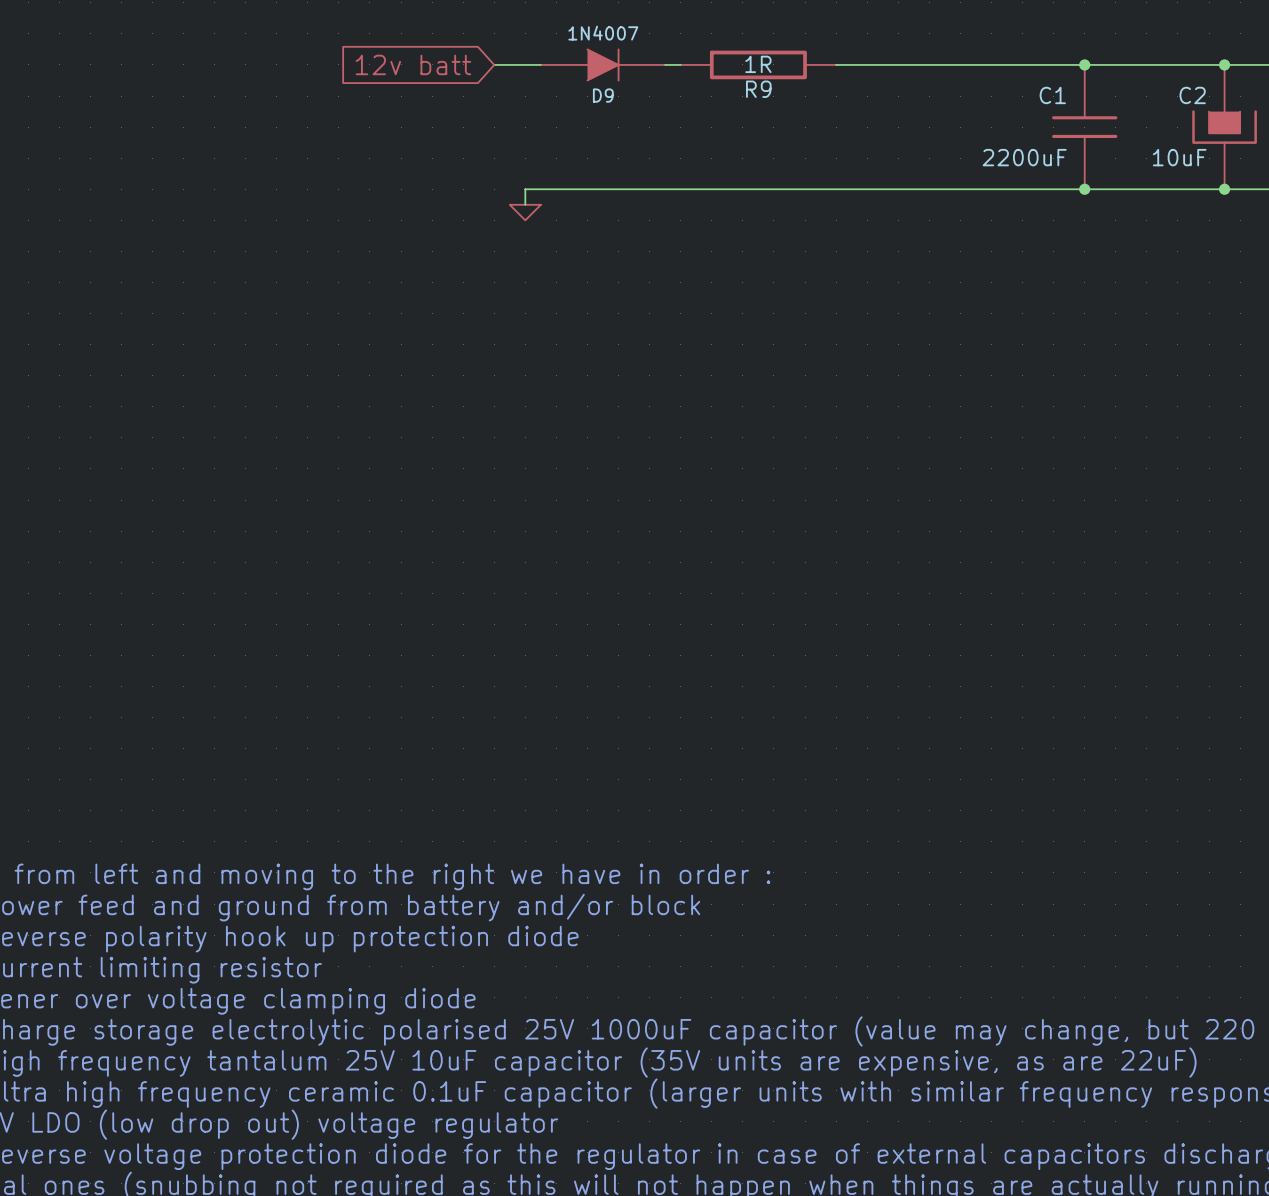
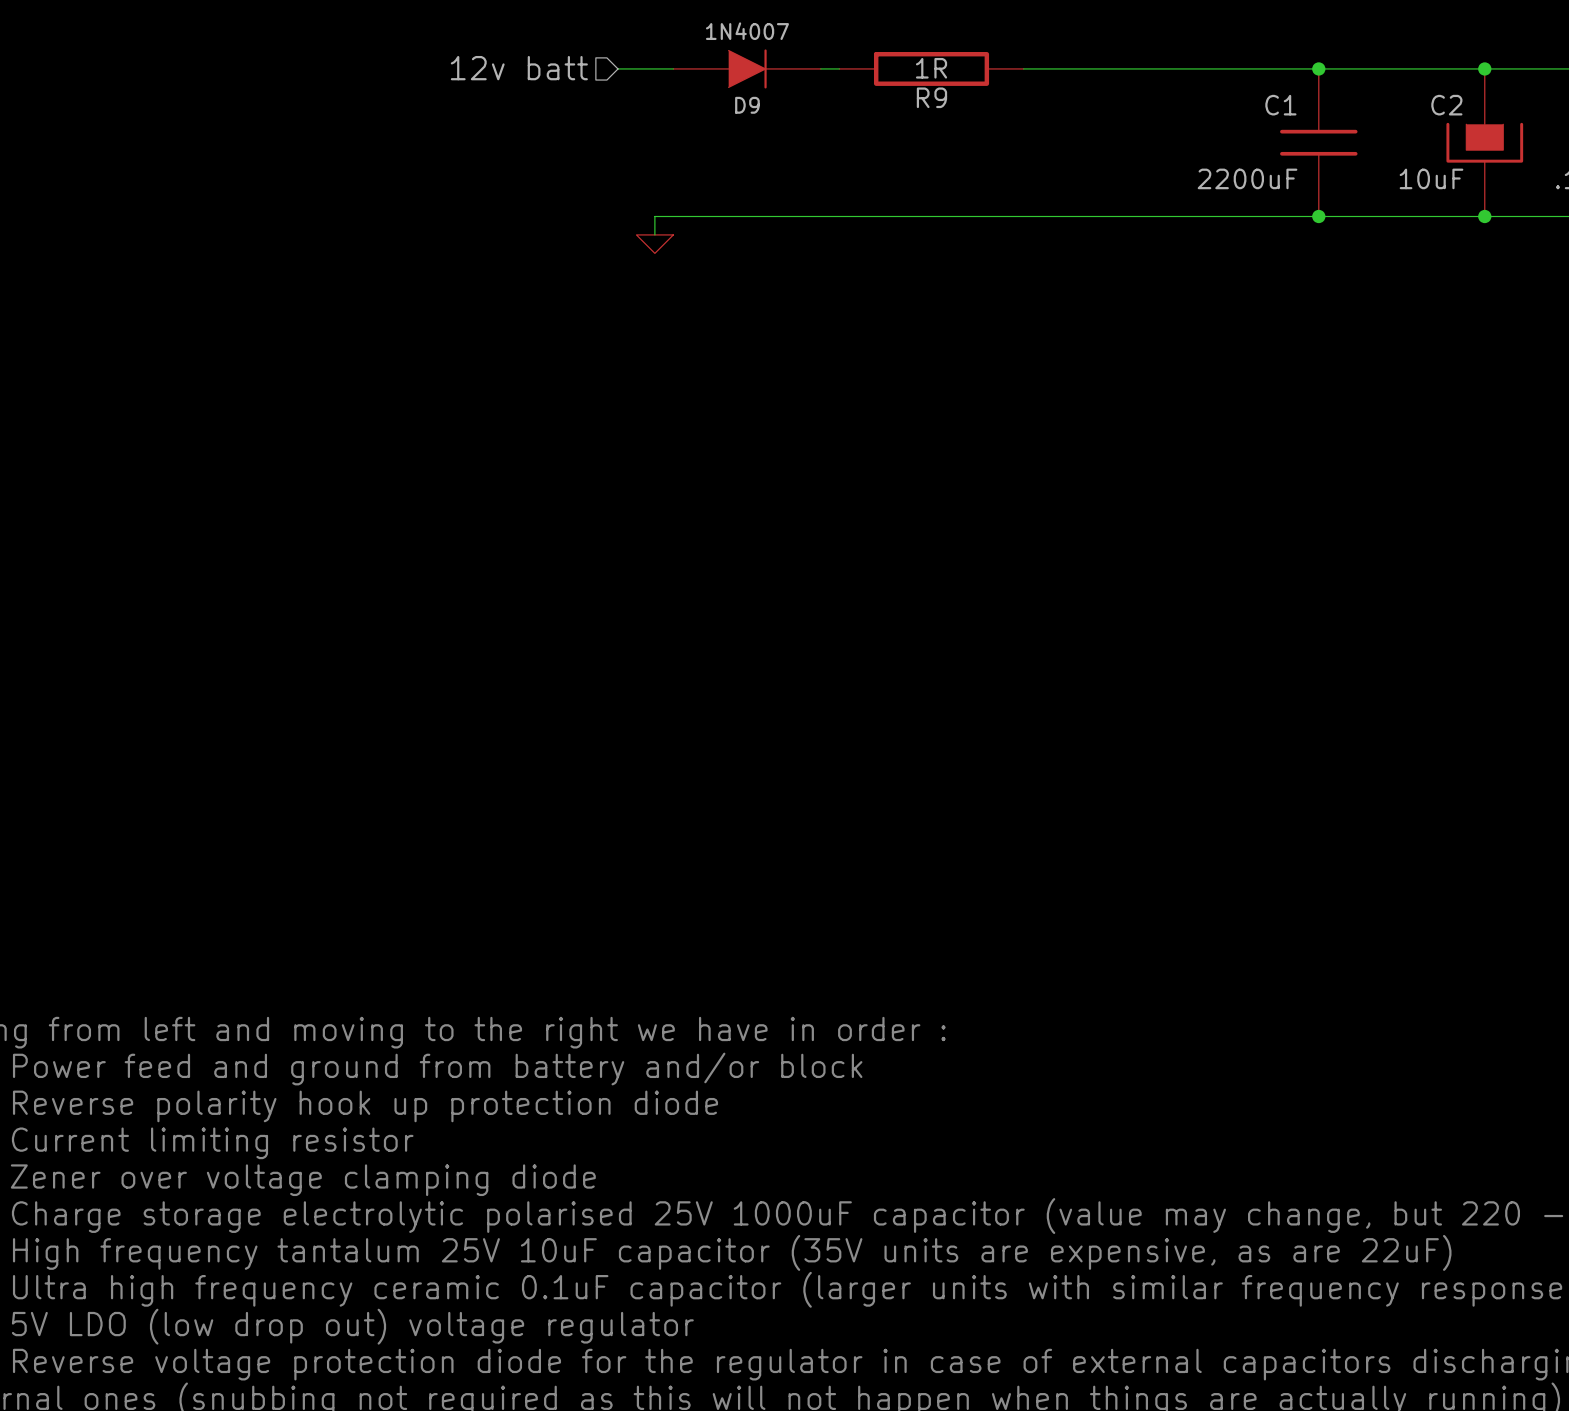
hierarchical label: none -> 12v batt (519, 68)
global label: 12v batt (413, 64) -> none

